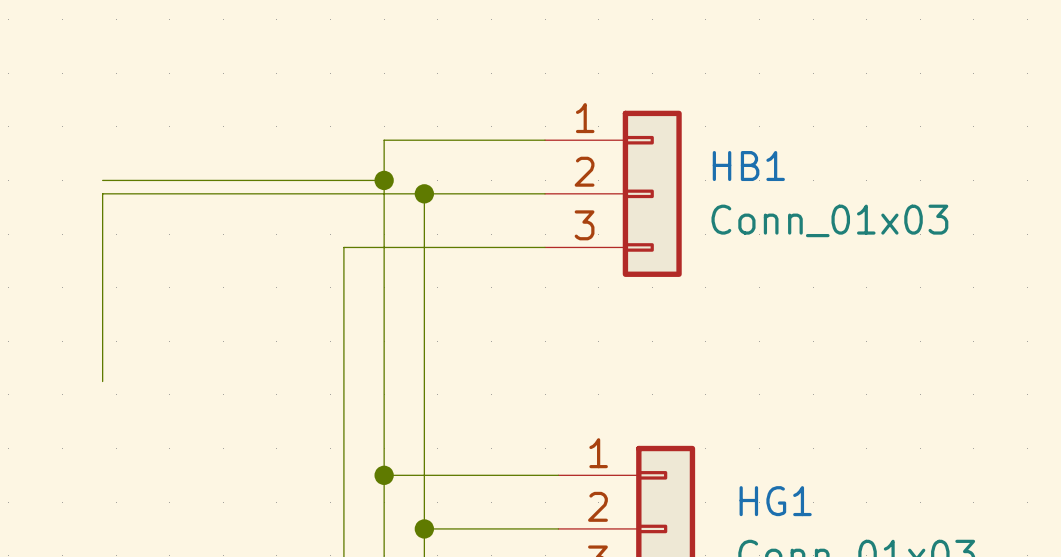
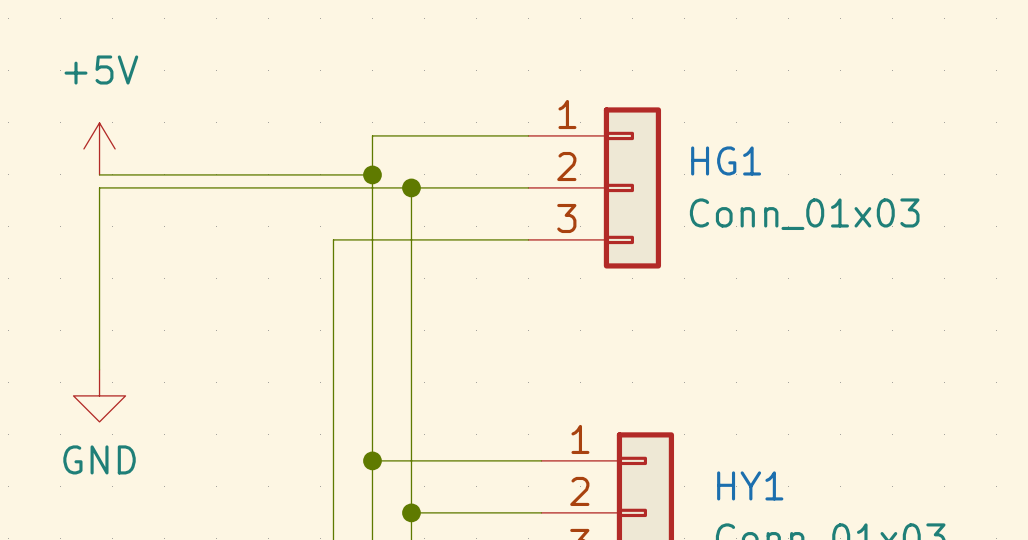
power symbol: none -> +5V (99, 148)
HB1 name: HB1 (748, 166) -> HG1 (726, 160)
power symbol: none -> GND (99, 395)
HG1 name: HG1 (775, 501) -> HY1 (750, 485)

